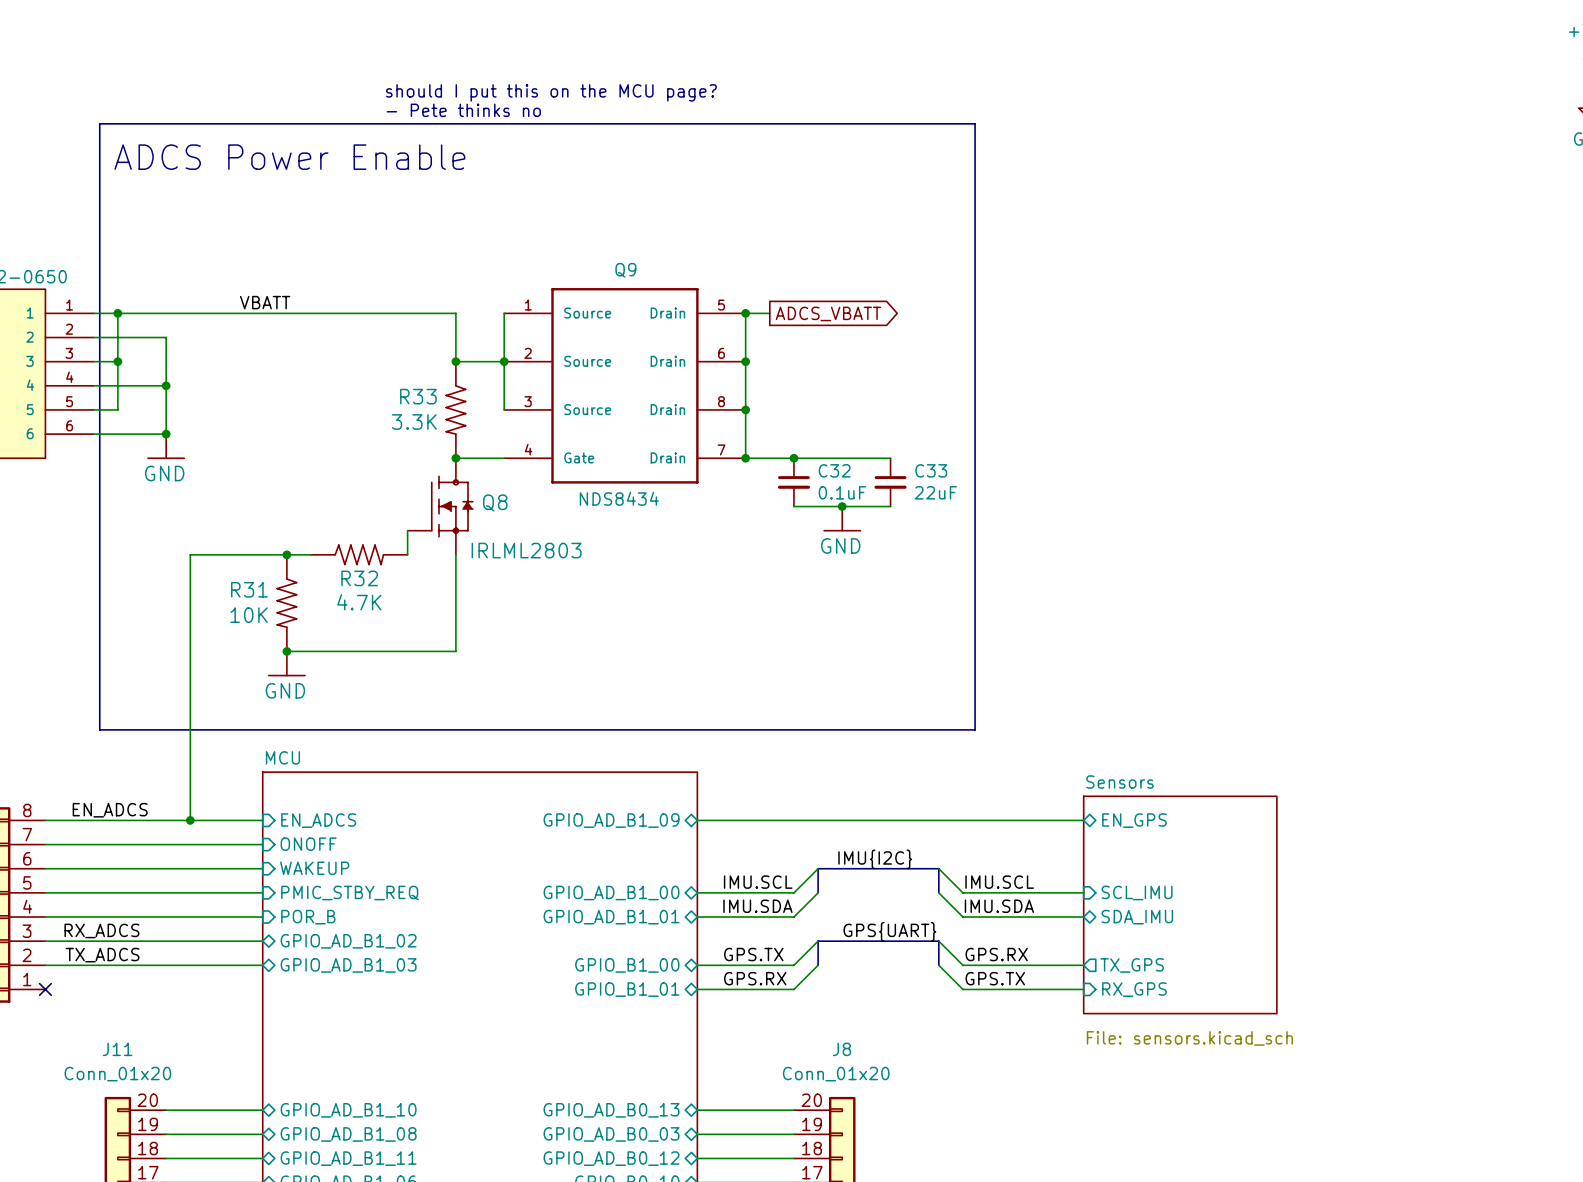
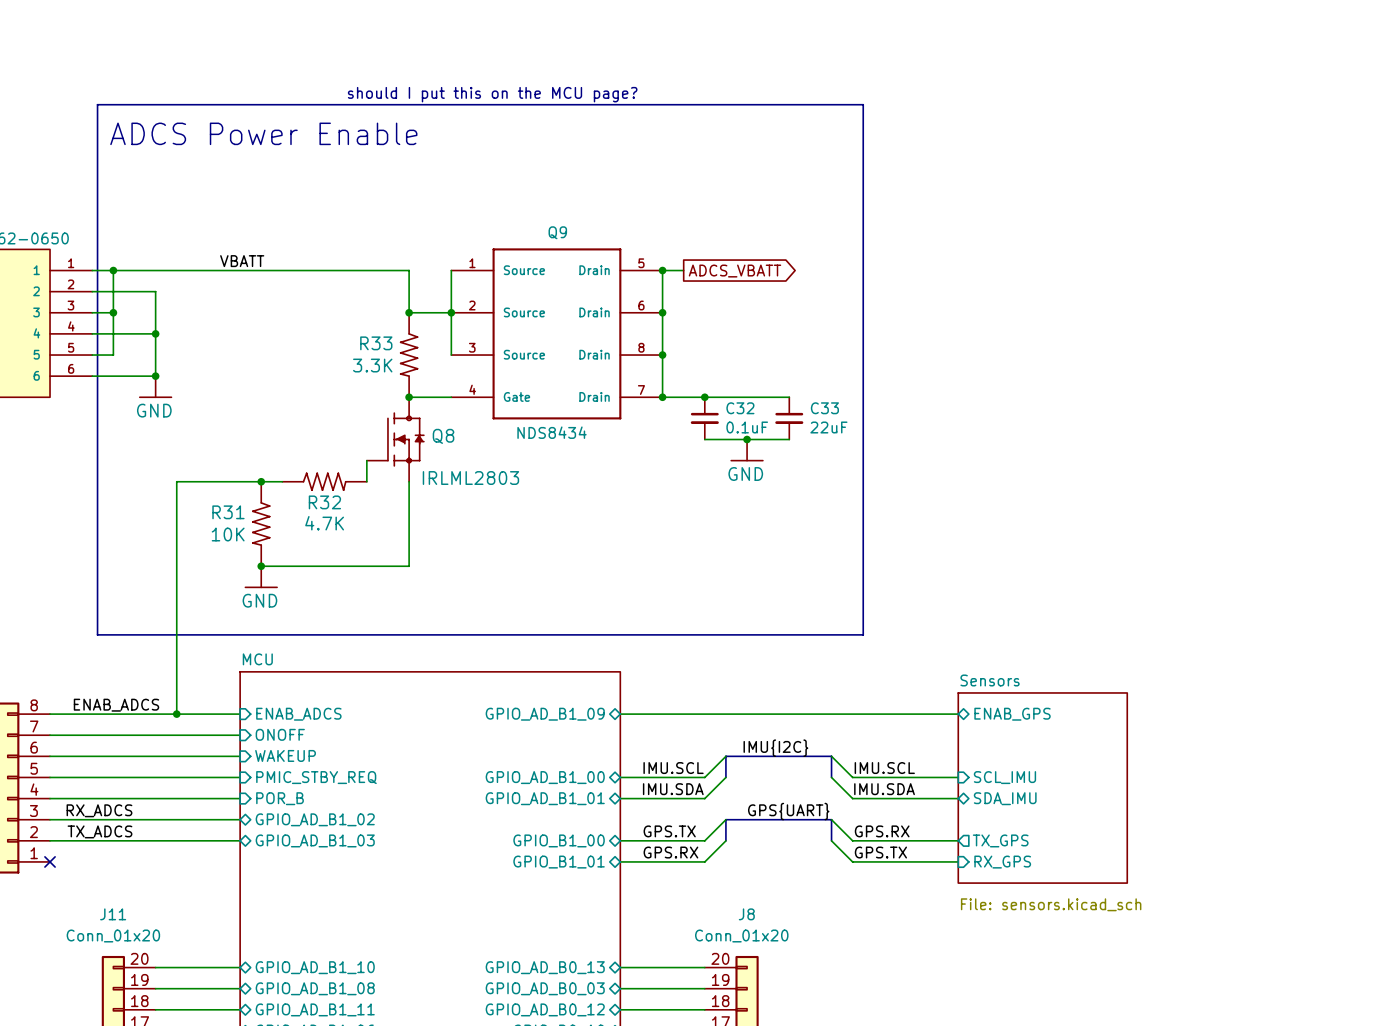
text: should I put this on the MCU page? (551, 92) -> none
text: - Pete thinks no (463, 110) -> should I put this on the MCU page? (492, 94)
label: EN_ADCS (110, 810) -> ENAB_ADCS (116, 705)
sheet pin: EN_ADCS (318, 820) -> ENAB_ADCS (298, 714)
sheet pin: EN_GPS (1134, 820) -> ENAB_GPS (1012, 714)

